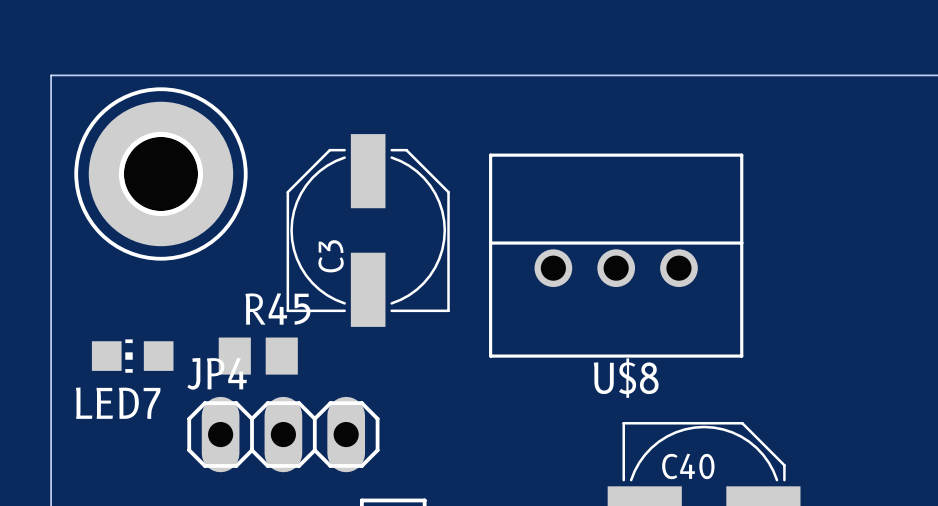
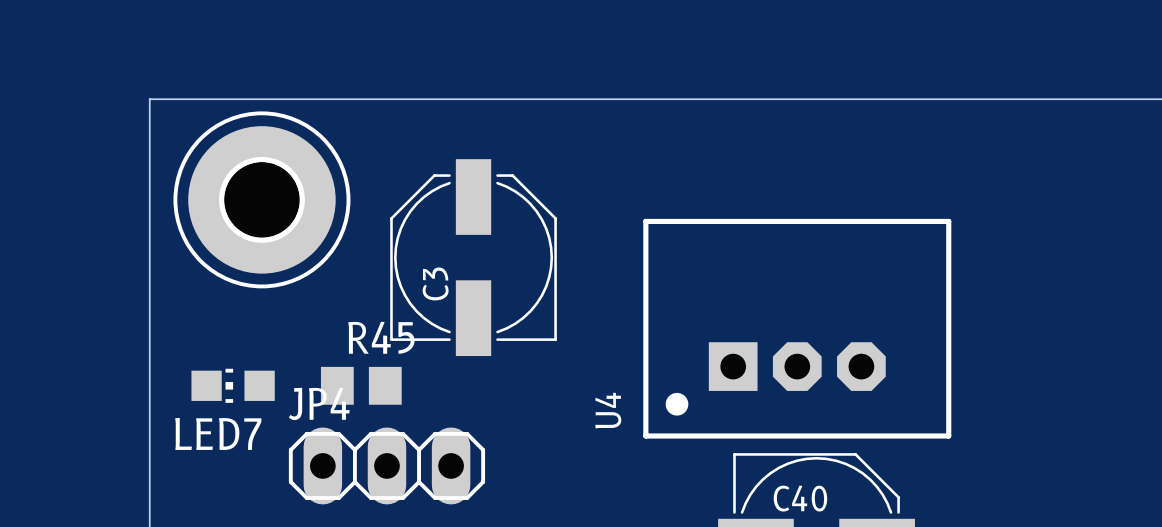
U$8: (616, 255) -> none
U4: none -> (797, 328)

